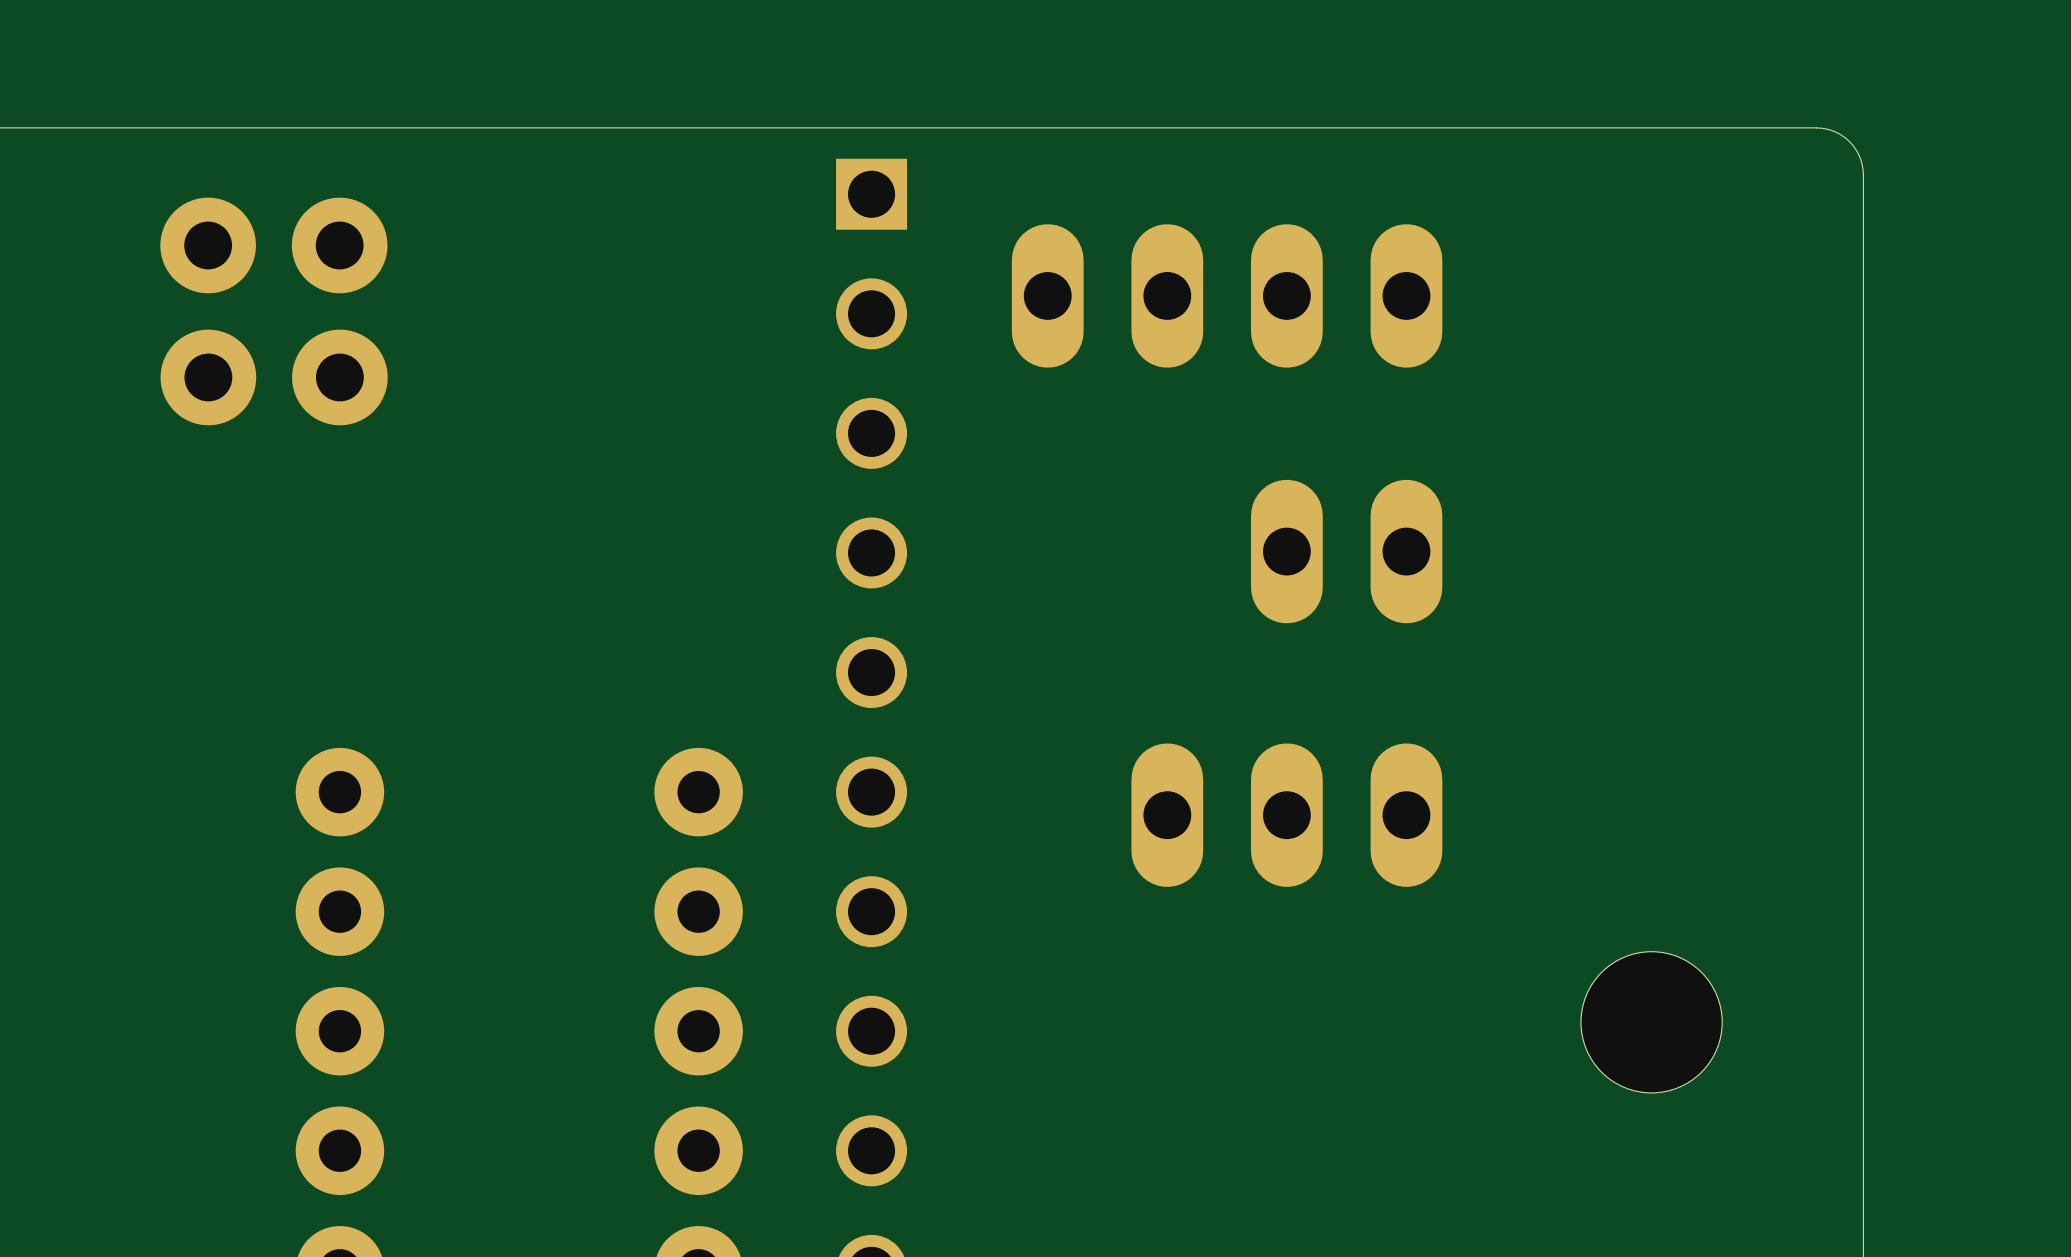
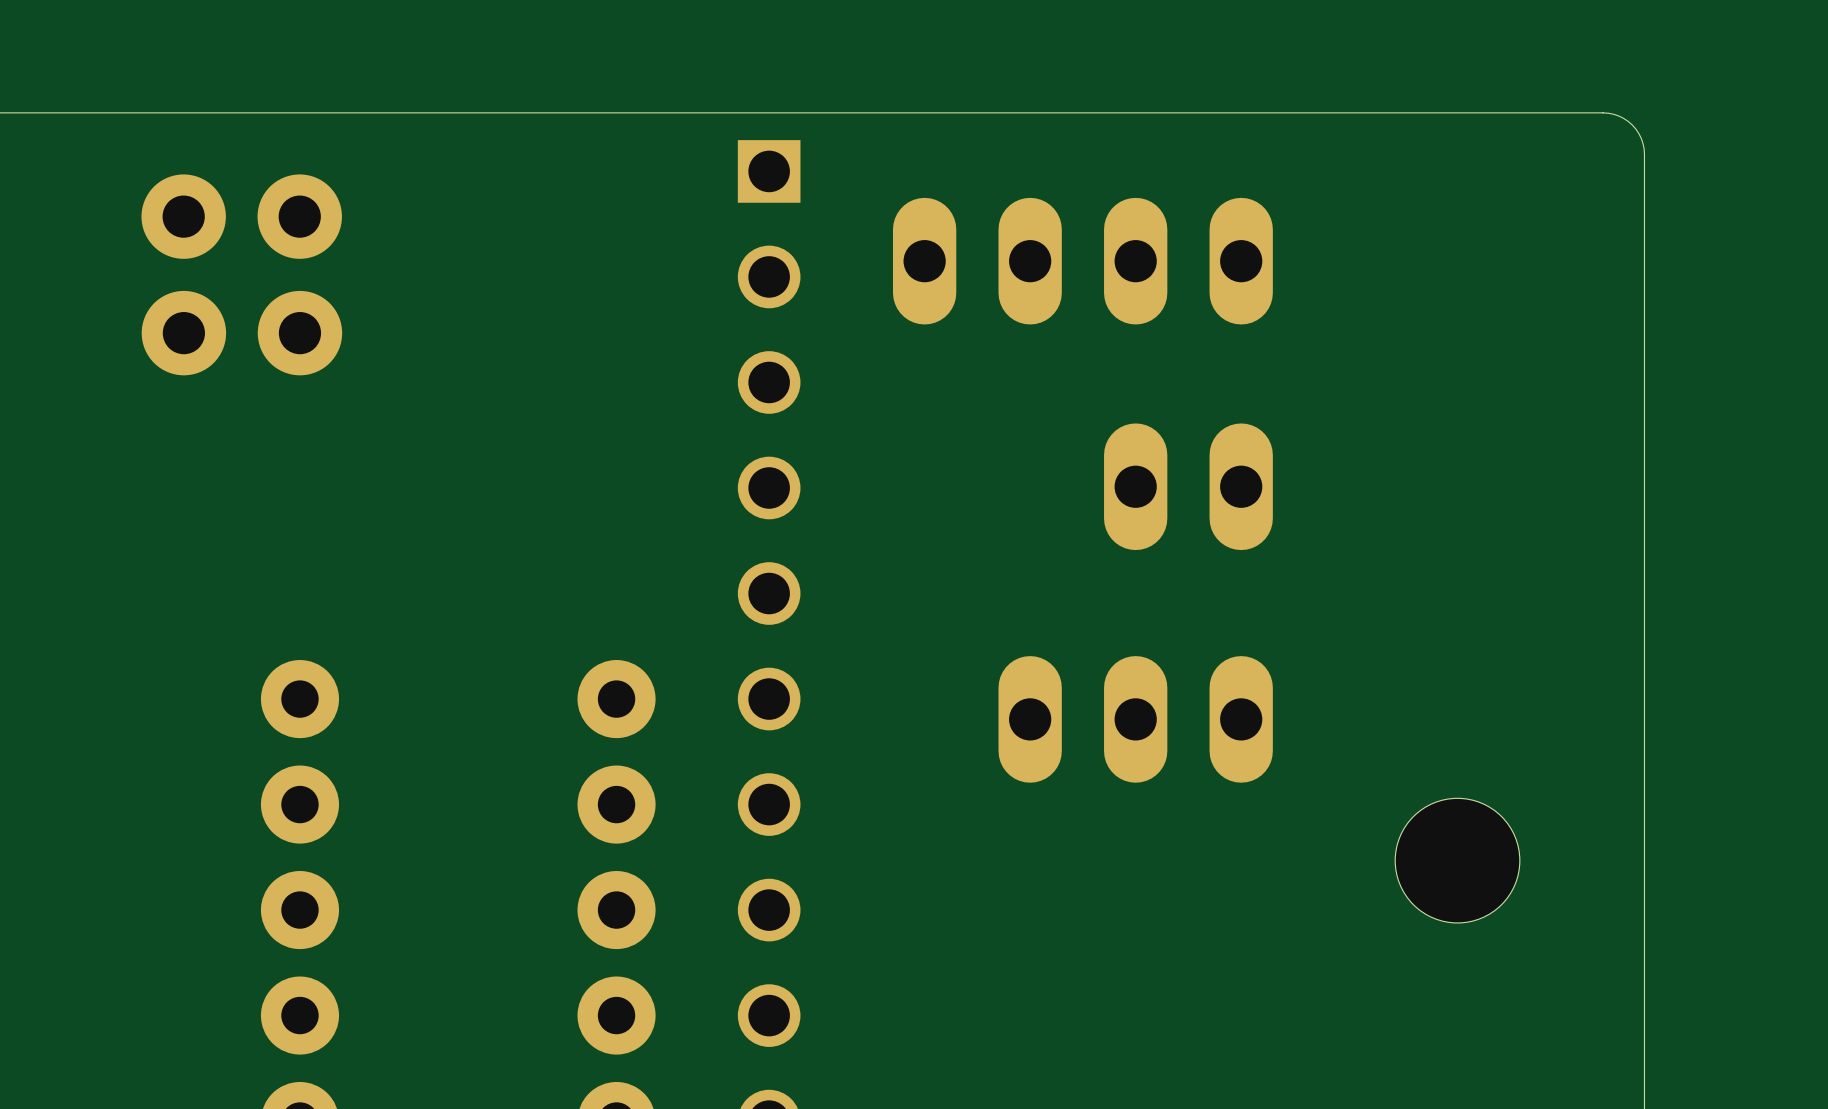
part position: (1651, 1022) -> (1457, 860)

